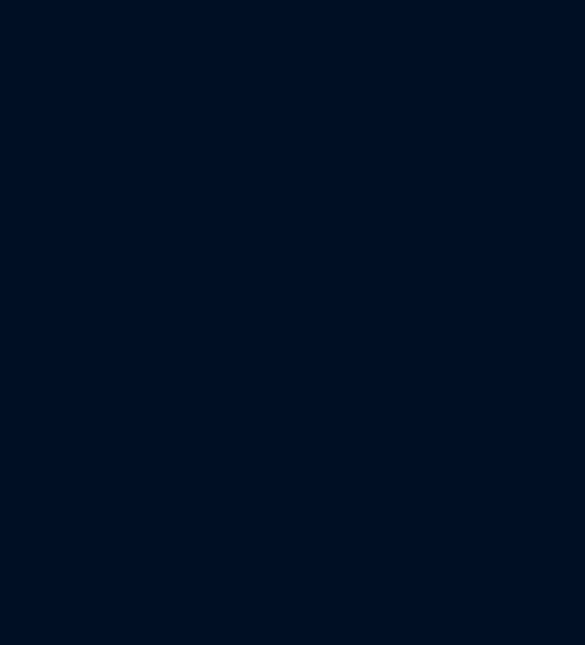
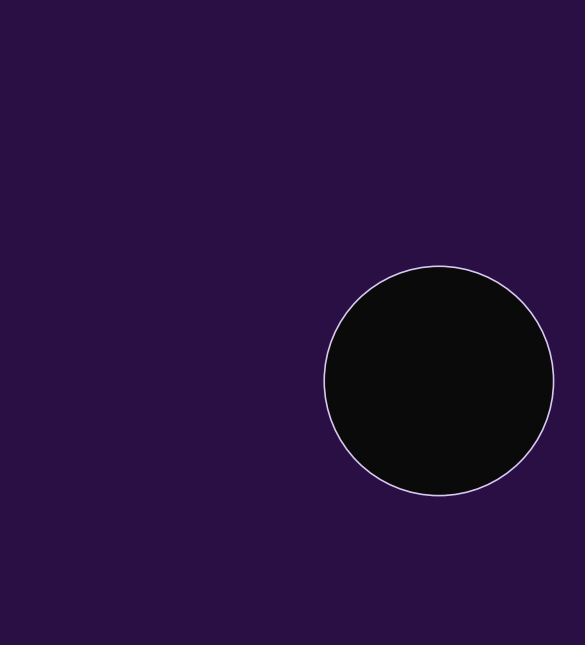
part: none -> (438, 380)

